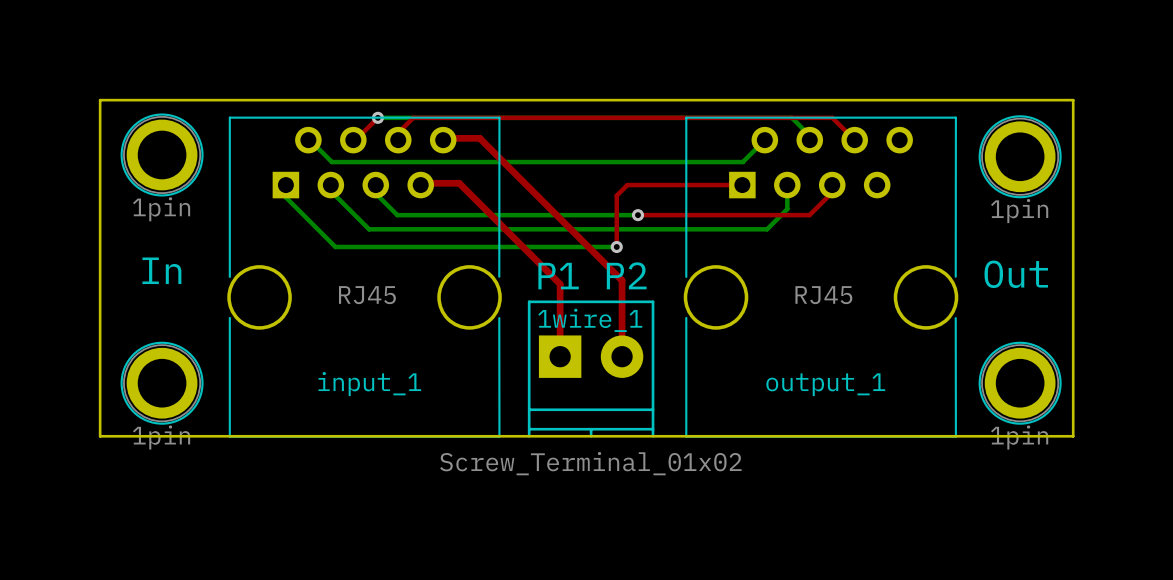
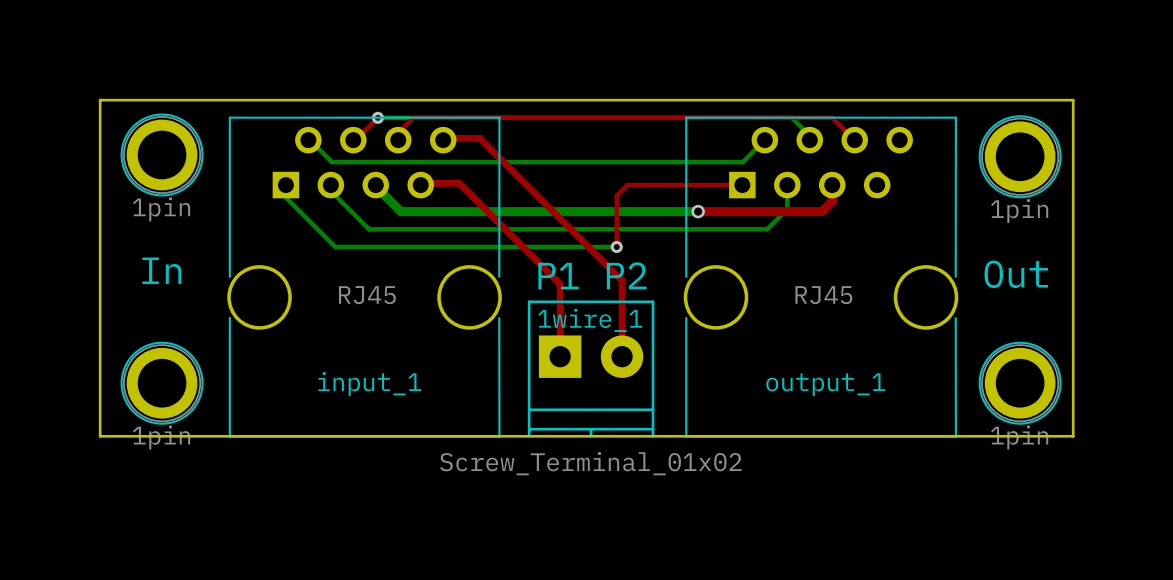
bottom track: (375, 186) (375, 193) (397, 215) (637, 215) -> (375, 186) (400, 211) (698, 211)
top track: (832, 192) (809, 215) (637, 215) -> (832, 192) (832, 201) (821, 211) (698, 211)
via: none -> (698, 211)
via: (637, 215) -> none

